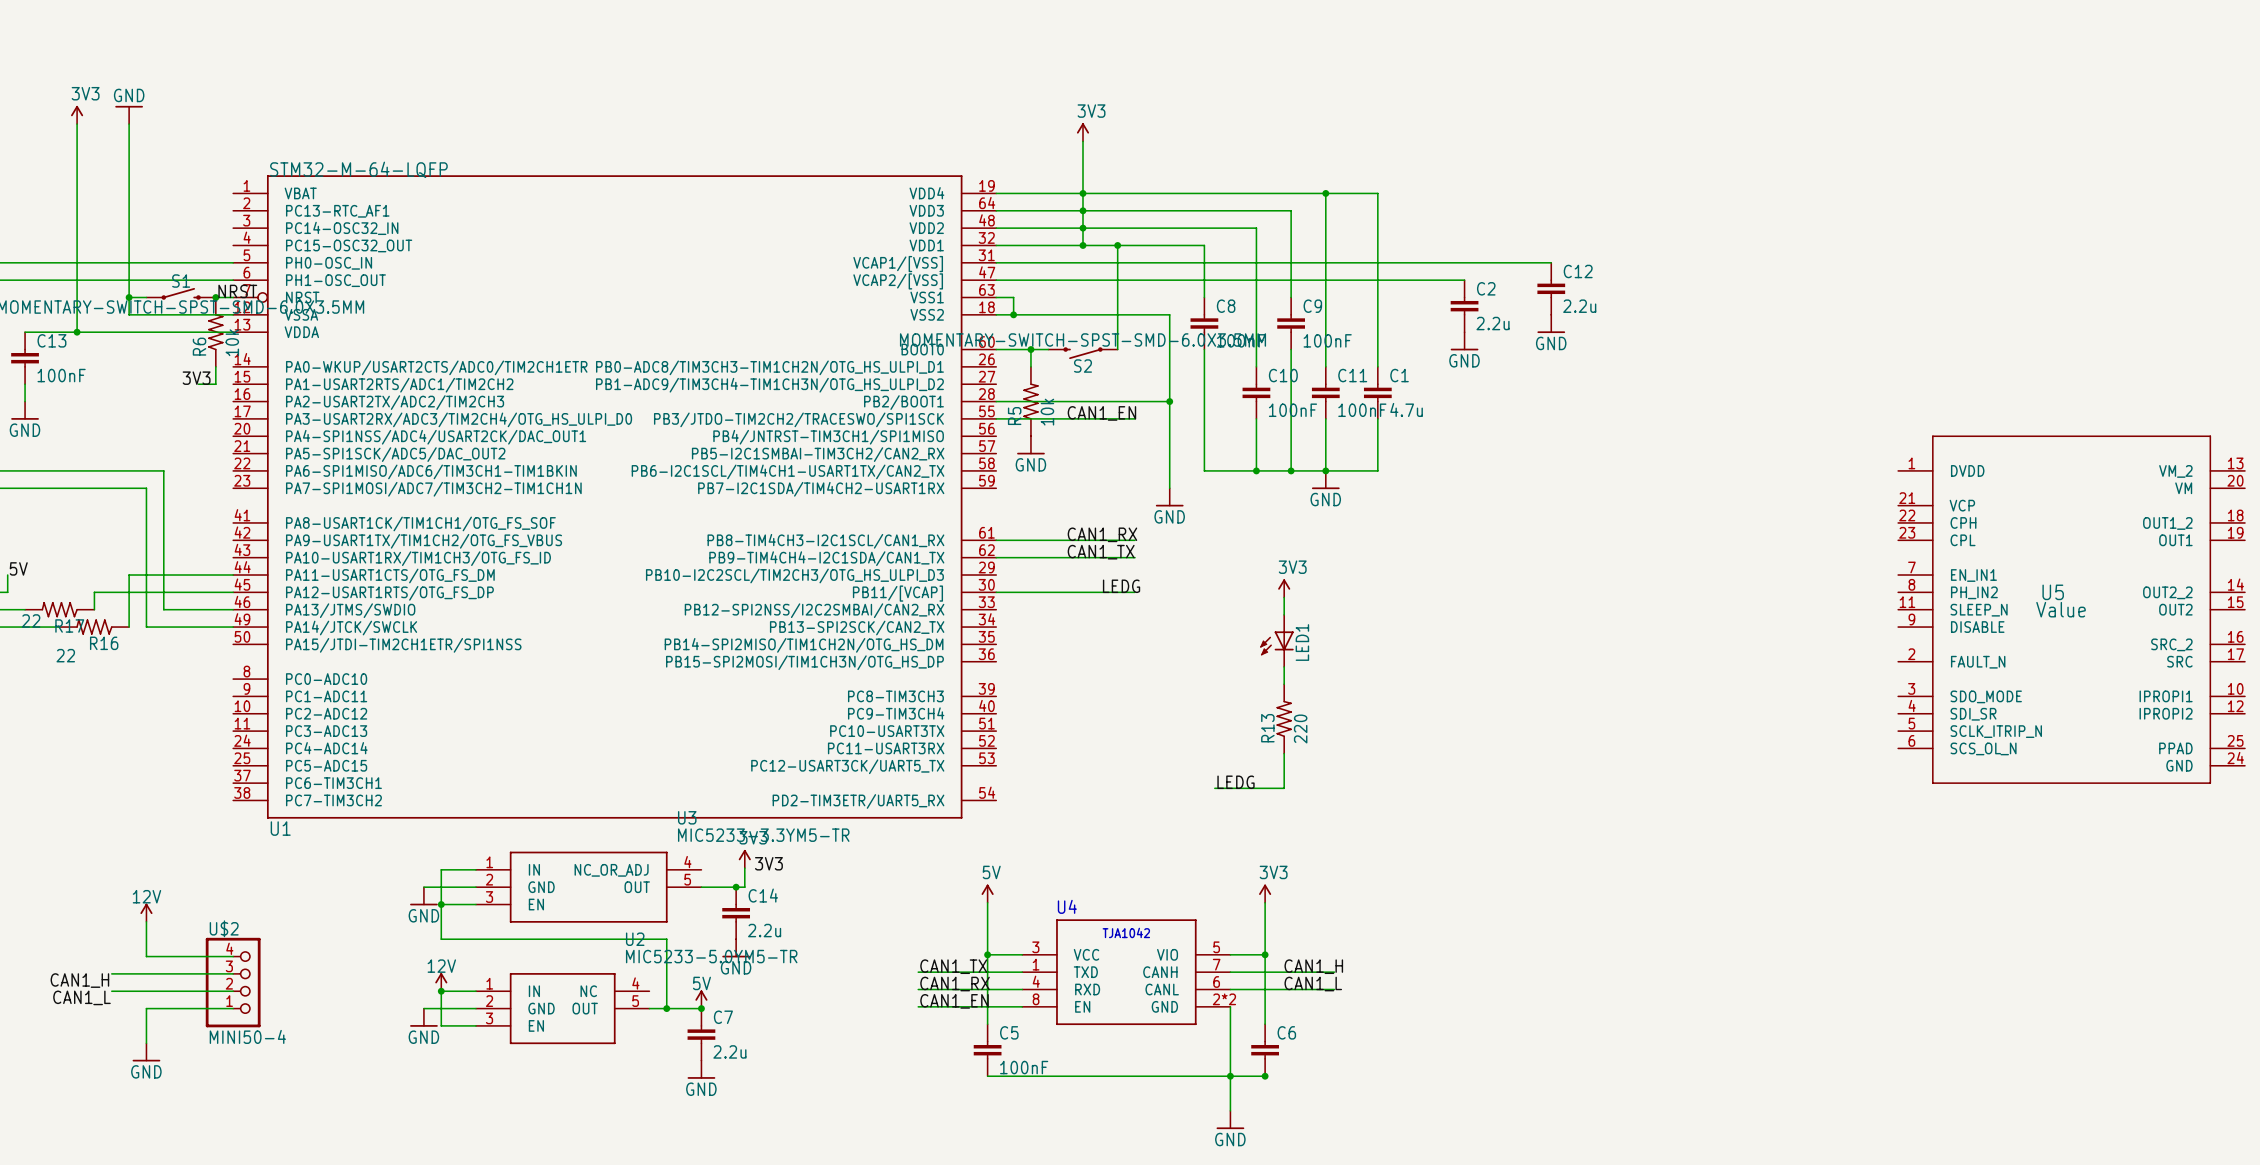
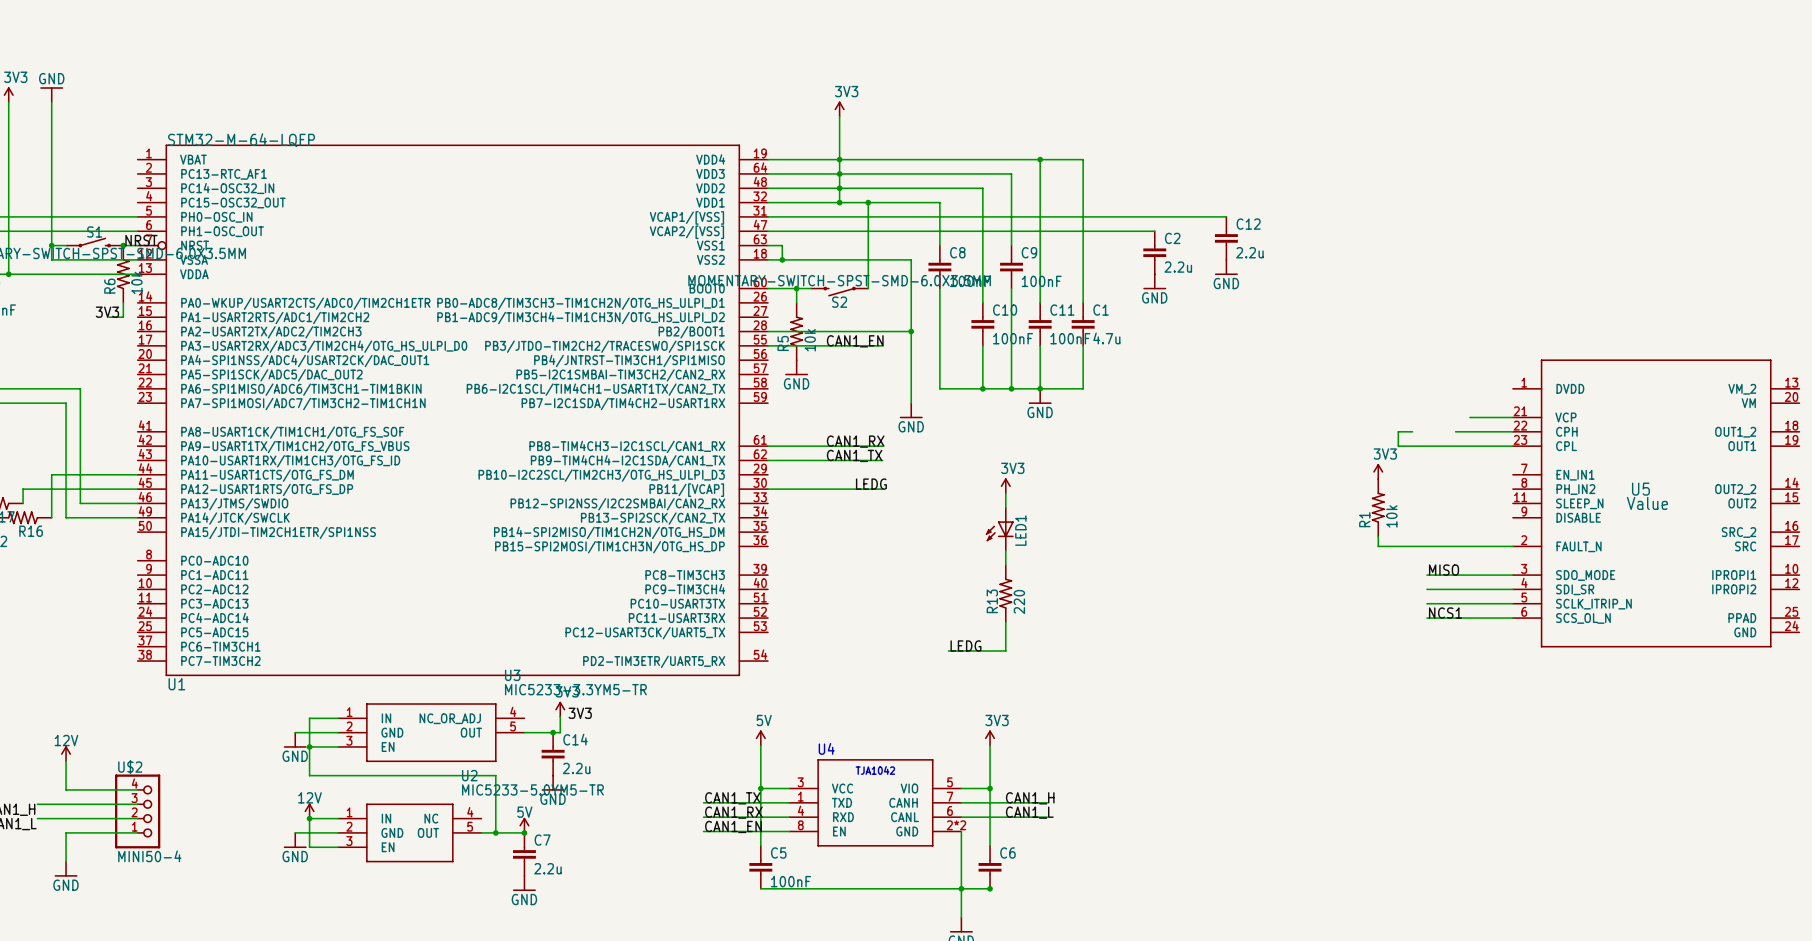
wire: none -> (1469, 417) (1512, 417)
wire: none -> (1412, 431) (1398, 431) (1398, 446) (1512, 446)
wire: none -> (1455, 431) (1512, 431)
power symbol: none -> 3V3 (1378, 471)
R1: none -> 10k (1378, 507)
wire: none -> (1378, 536) (1378, 546) (1512, 546)
label: none -> MISO (1444, 570)
wire: none -> (1426, 575) (1512, 575)
wire: none -> (1426, 589) (1512, 589)
wire: none -> (1426, 603) (1512, 603)
label: none -> NCS1 (1445, 613)
wire: none -> (1426, 618) (1512, 618)

